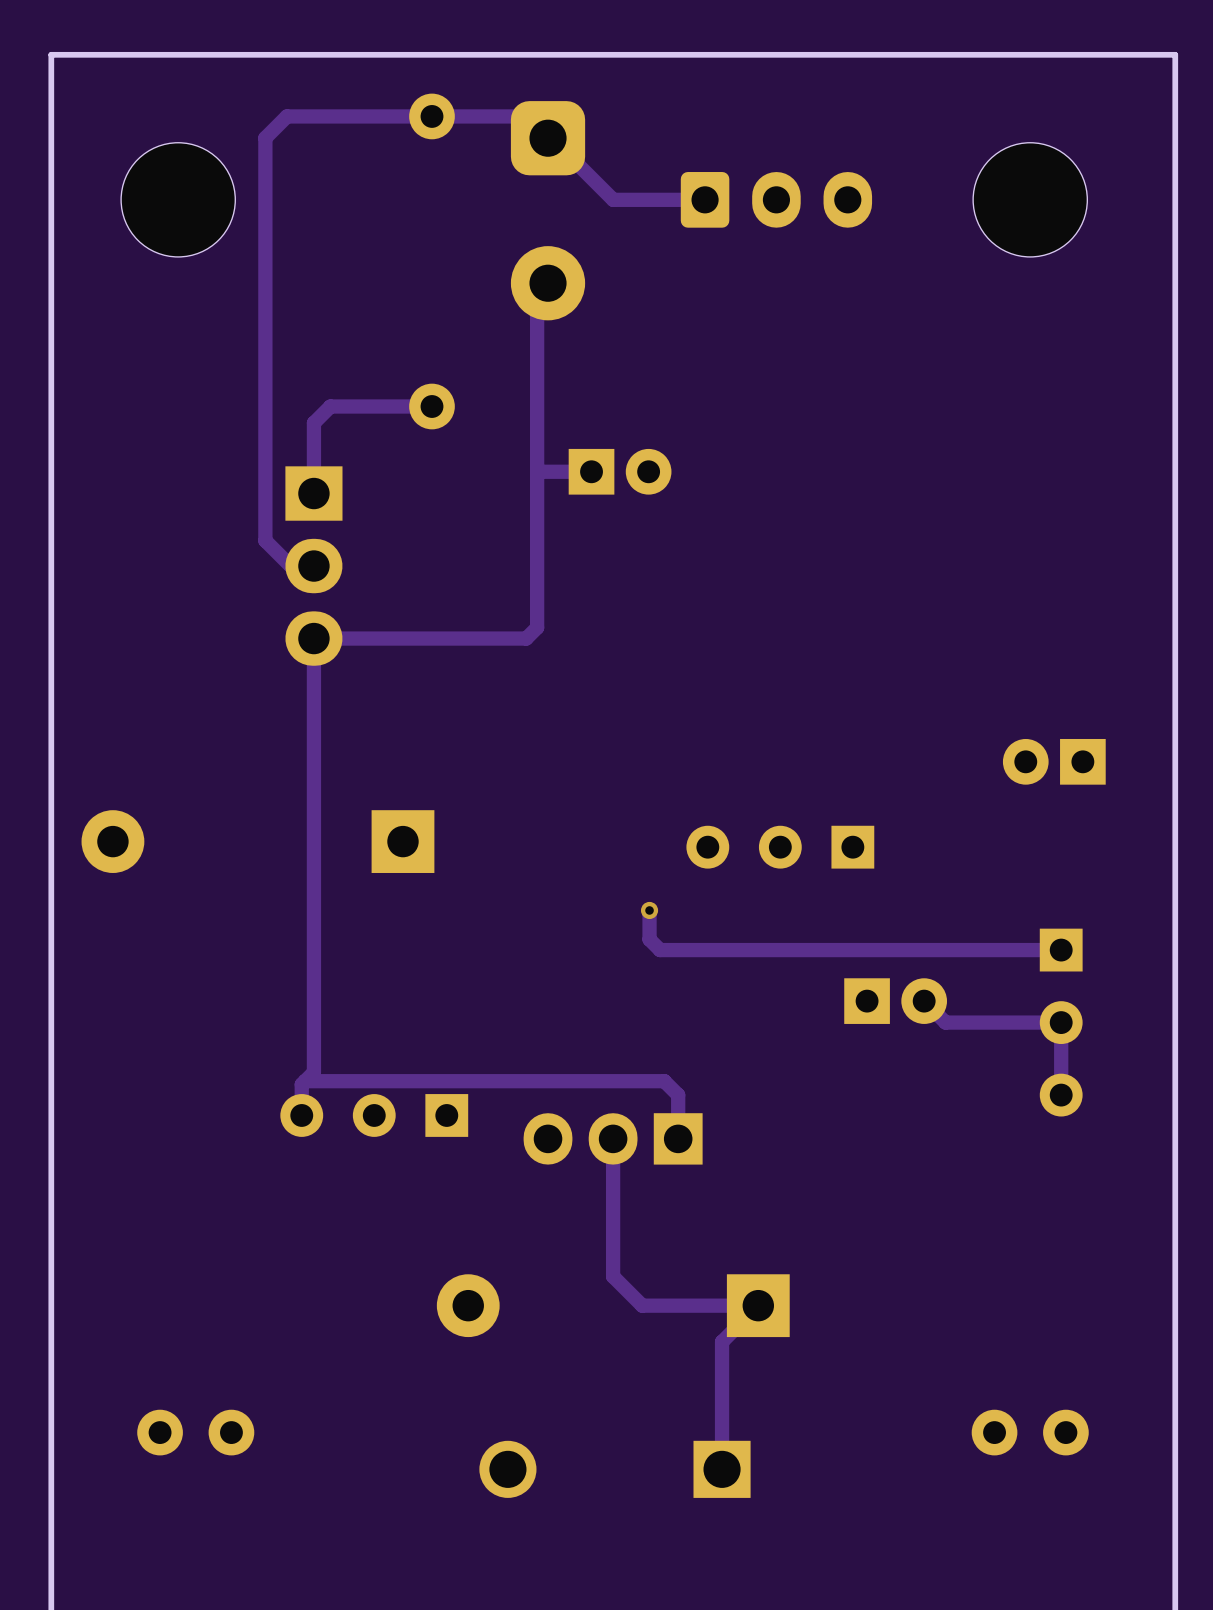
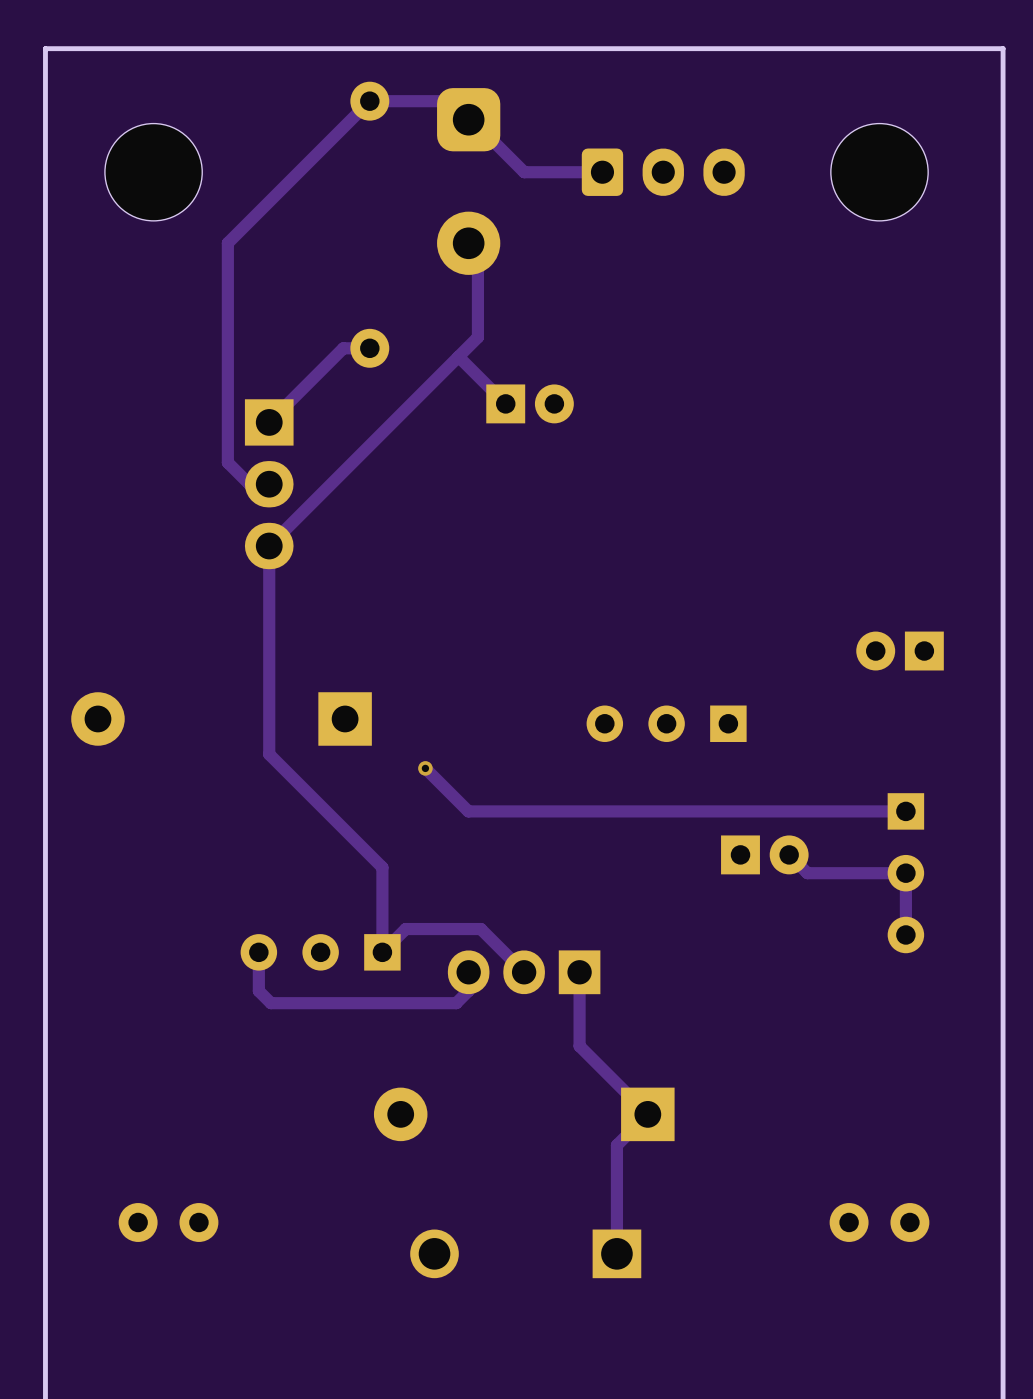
track: (431, 116) (286, 116) (265, 138) (265, 283) -> (369, 101) (227, 243)
track: (537, 294) (537, 470) (591, 471) -> (458, 356) (505, 403)
track: (400, 406) (330, 406) (313, 423) (313, 493) -> (343, 348) (269, 422)
track: (537, 472) (537, 627) (526, 638) (313, 638) -> (477, 249) (477, 337) (269, 546)
track: (313, 883) (313, 1072) (301, 1084) (301, 1115) -> (269, 754) (382, 867) (382, 952) (405, 929) (480, 929) (524, 972)
track: (649, 910) (649, 939) (660, 950) -> (425, 768) (468, 811) (564, 811)
via position: (649, 910) -> (425, 768)
track: (305, 1081) (664, 1081) (678, 1095) (678, 1138) -> none
track: none -> (258, 952) (258, 991) (270, 1003) (456, 1003) (468, 990) (468, 972)
track: (613, 1138) (613, 1276) (642, 1305) (758, 1305) -> (579, 972) (579, 1046) (647, 1114)

